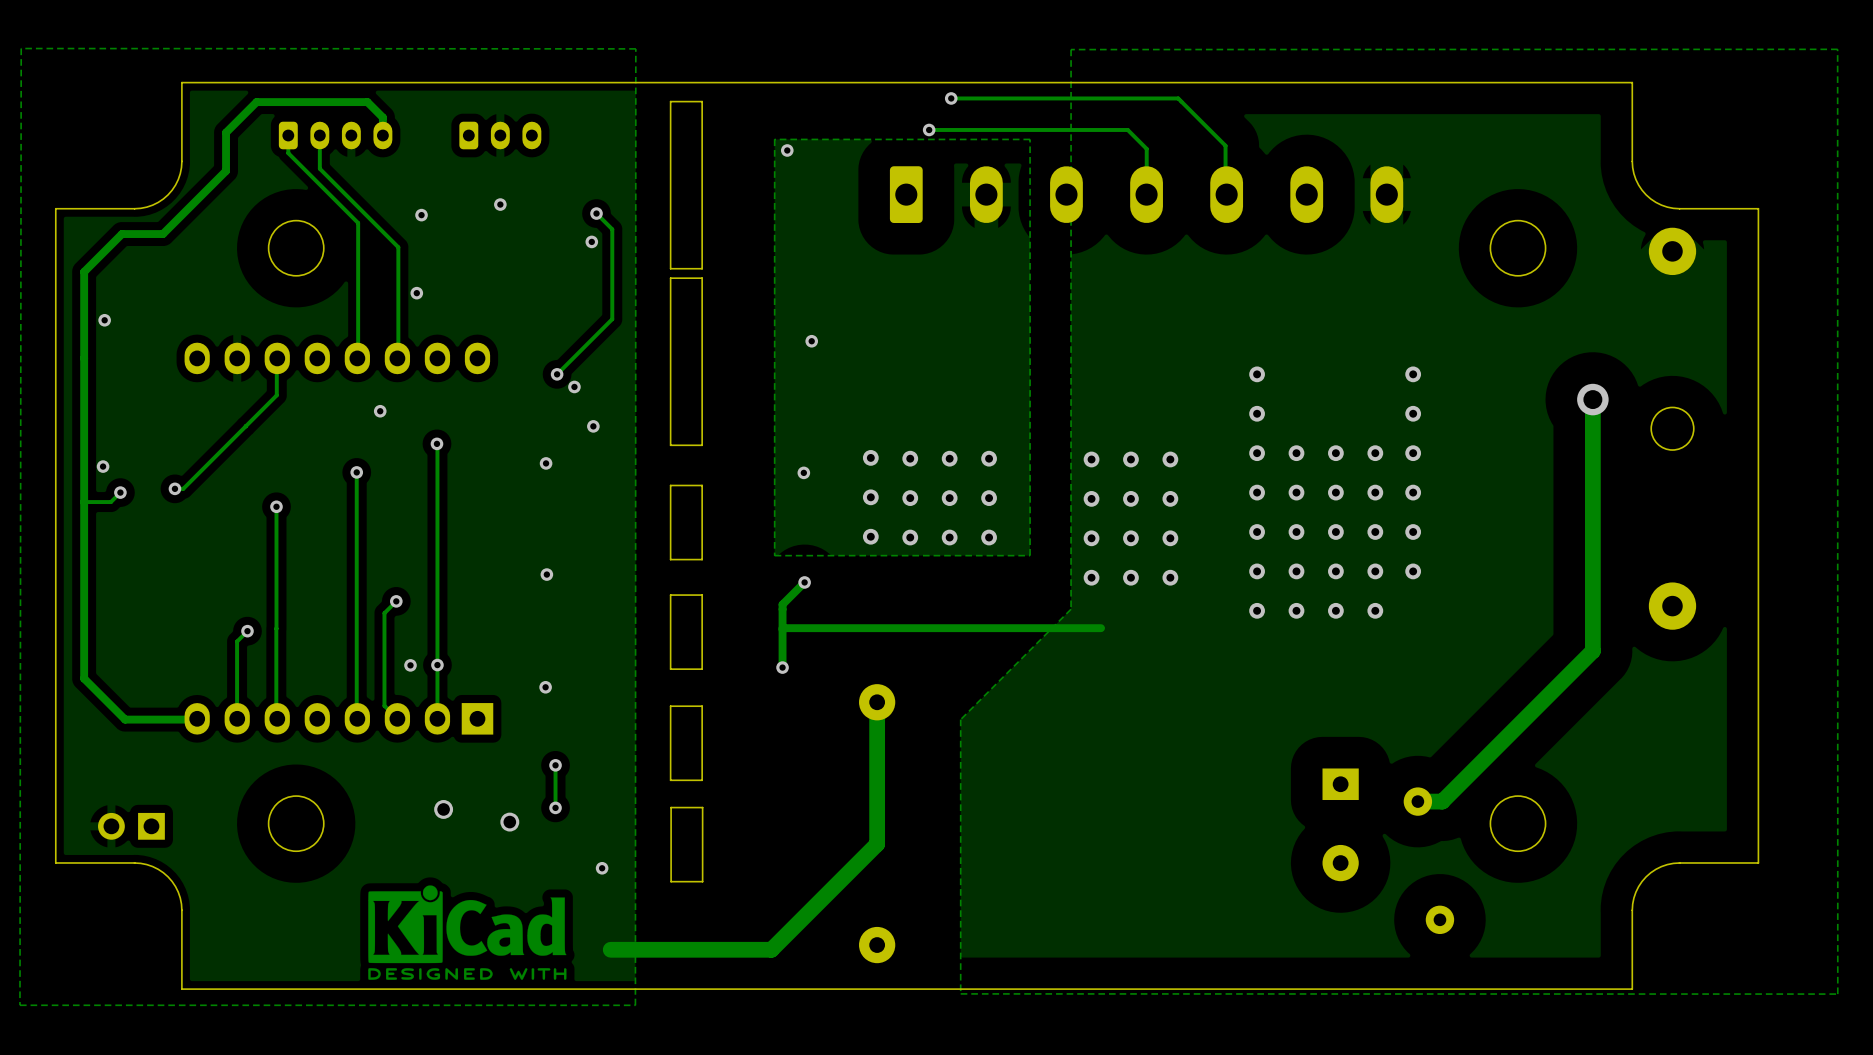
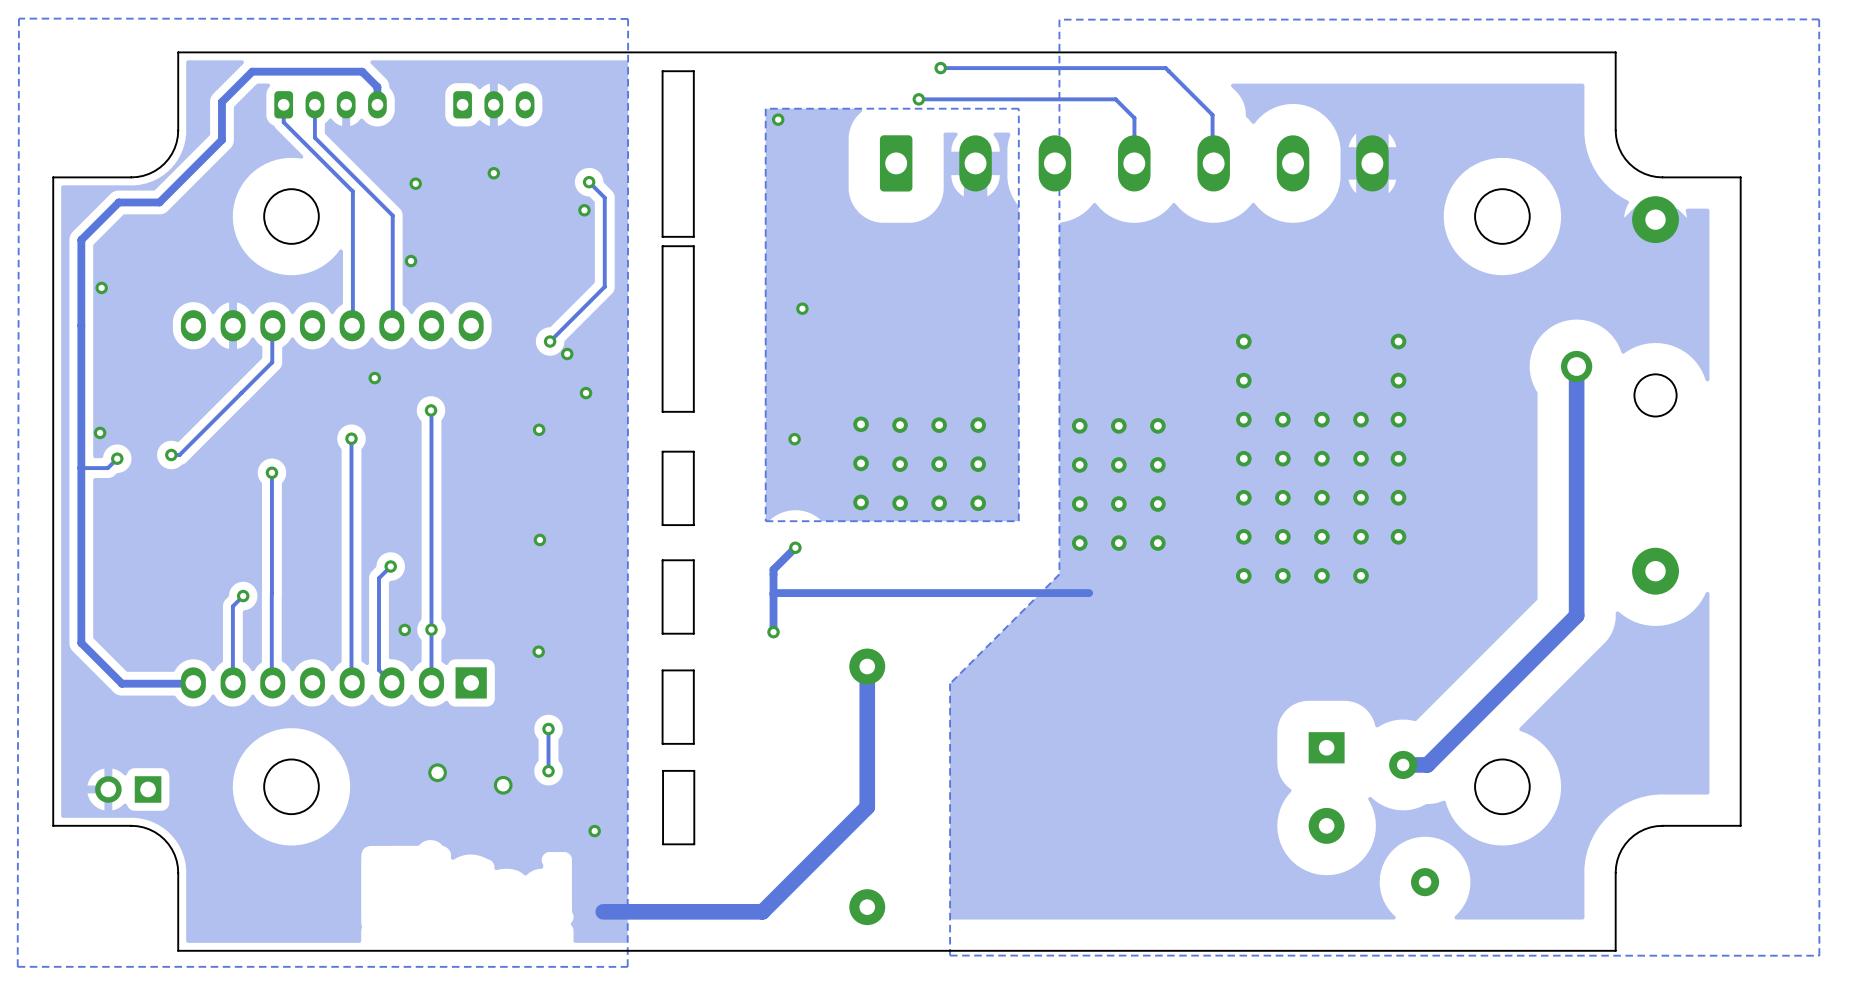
drawing: [368, 885, 567, 980] -> none

